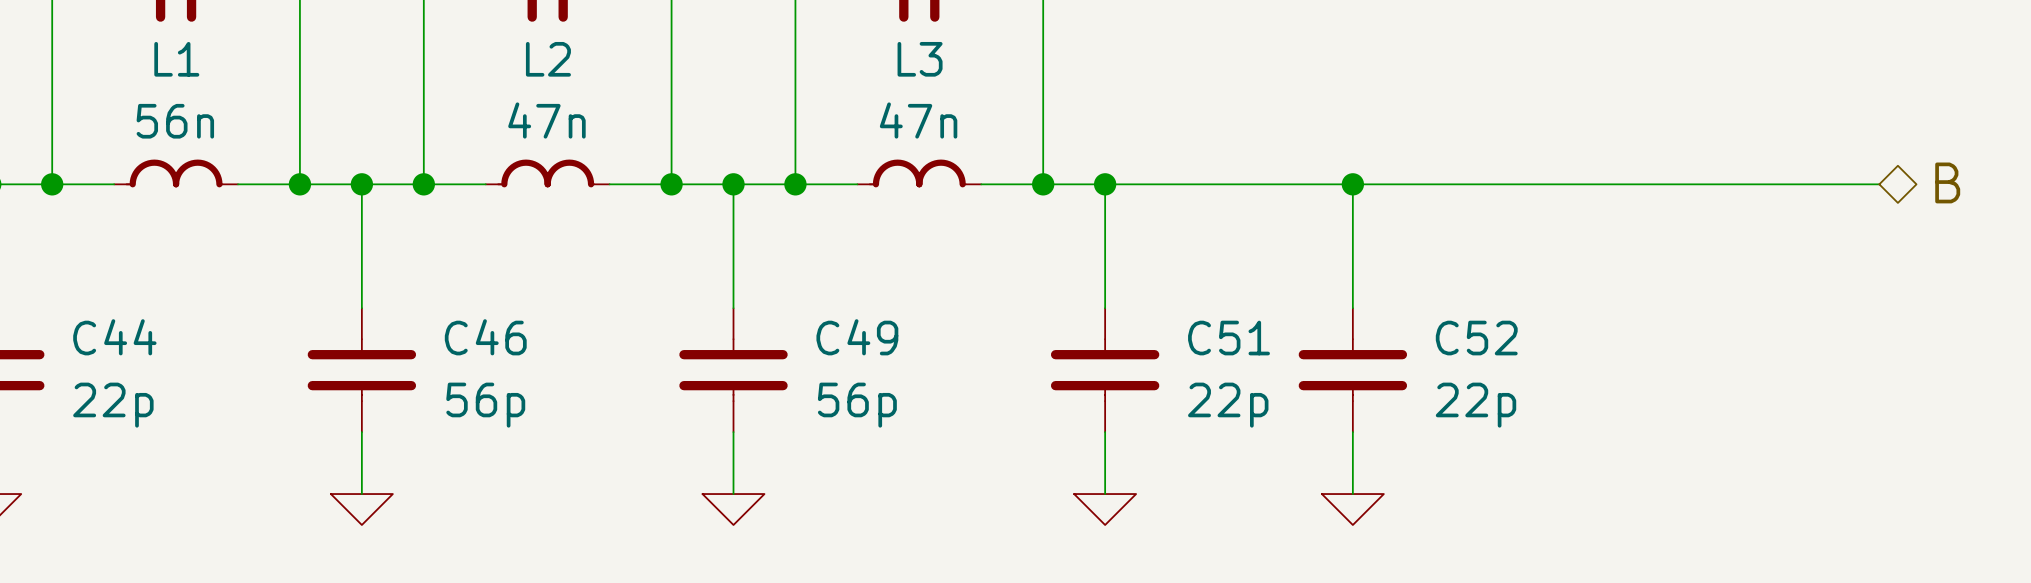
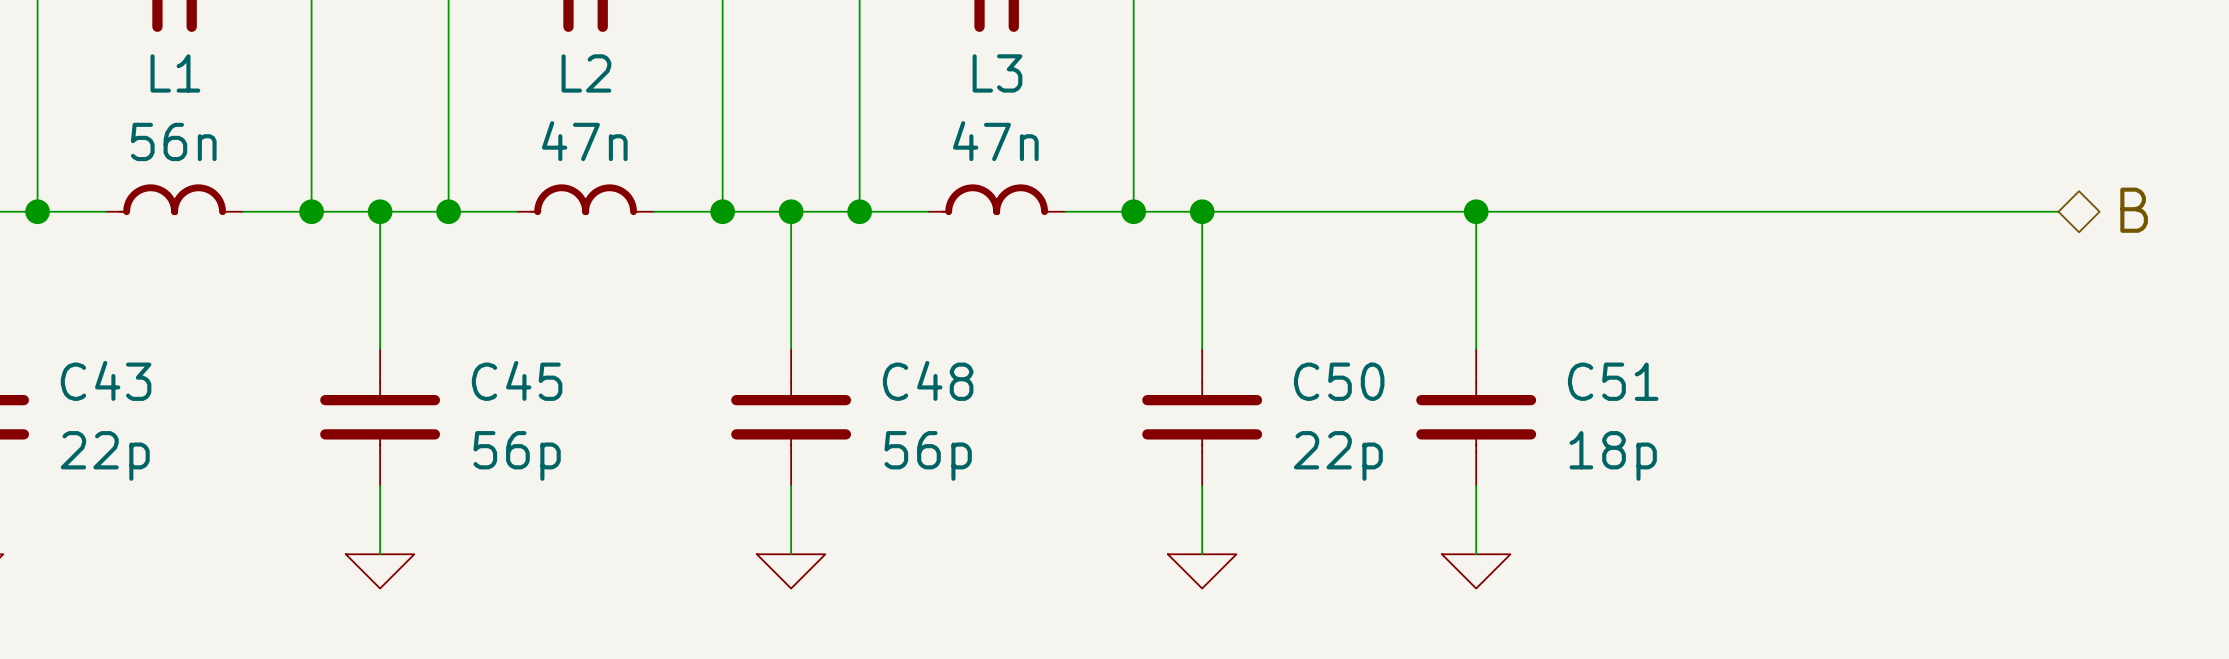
C44 name: C44 (114, 337) -> C43 (106, 380)
C46 name: C46 (485, 337) -> C45 (517, 380)
C49 name: C49 (857, 337) -> C48 (928, 380)
C51 name: C51 (1229, 338) -> C50 (1339, 381)
C52 name: C52 (1476, 338) -> C51 (1613, 381)
C52 value: 22p (1476, 405) -> 18p (1613, 455)

